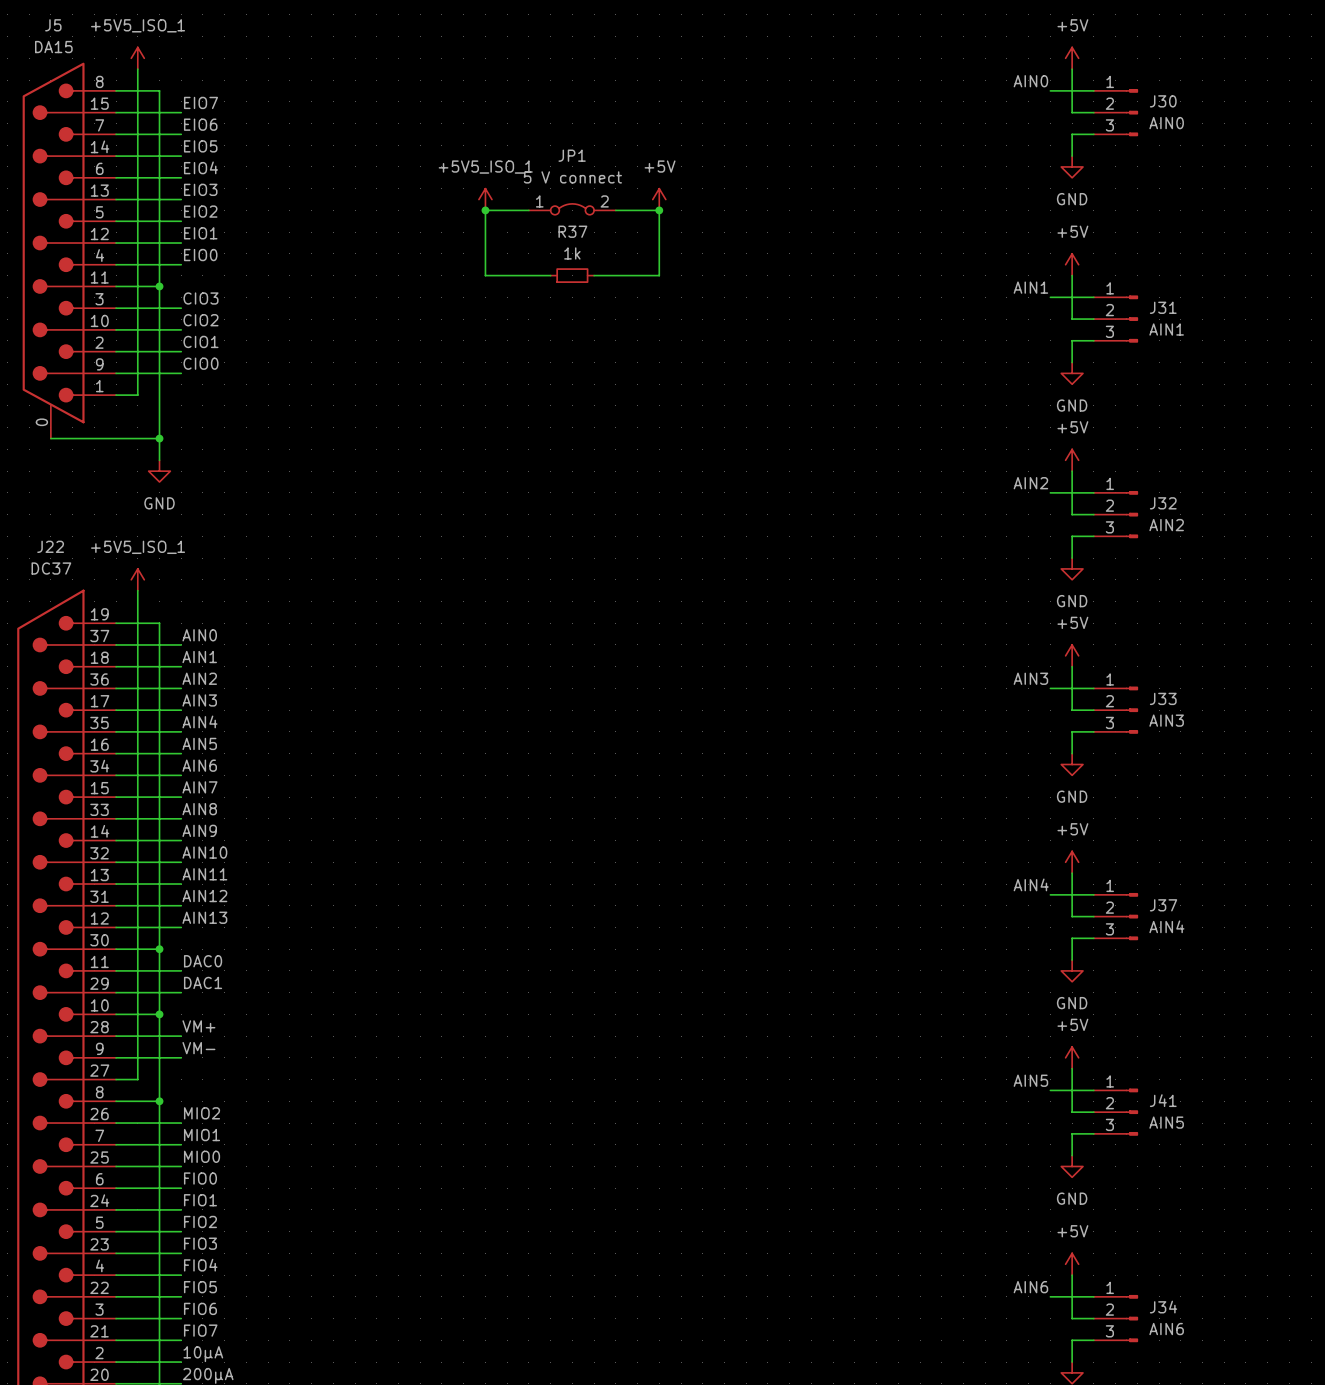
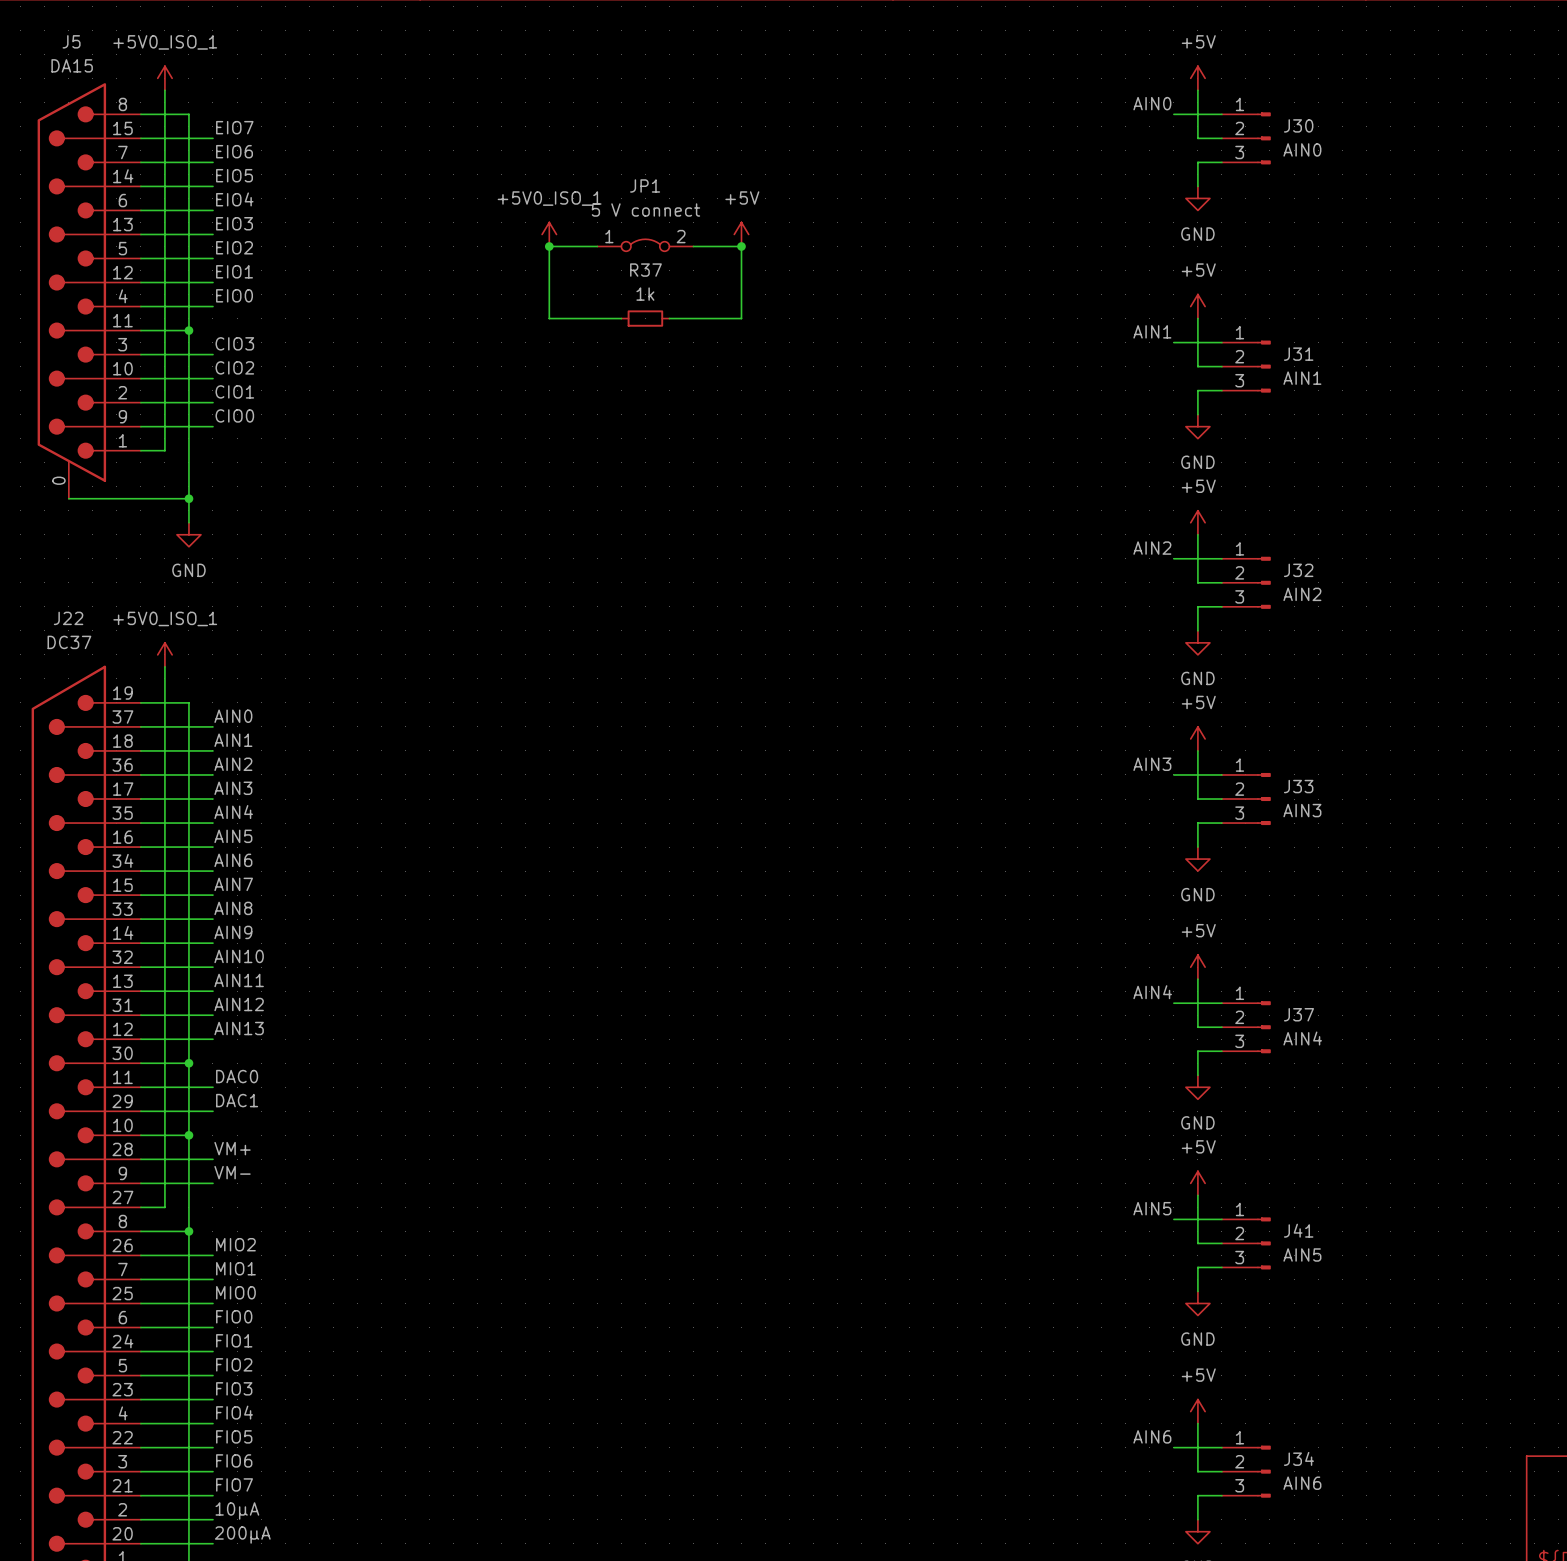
power symbol: +5V5_ISO_1 (137, 58) -> +5V0_ISO_1 (164, 78)
power symbol: +5V5_ISO_1 (485, 199) -> +5V0_ISO_1 (549, 234)
power symbol: +5V5_ISO_1 (137, 579) -> +5V0_ISO_1 (164, 654)

